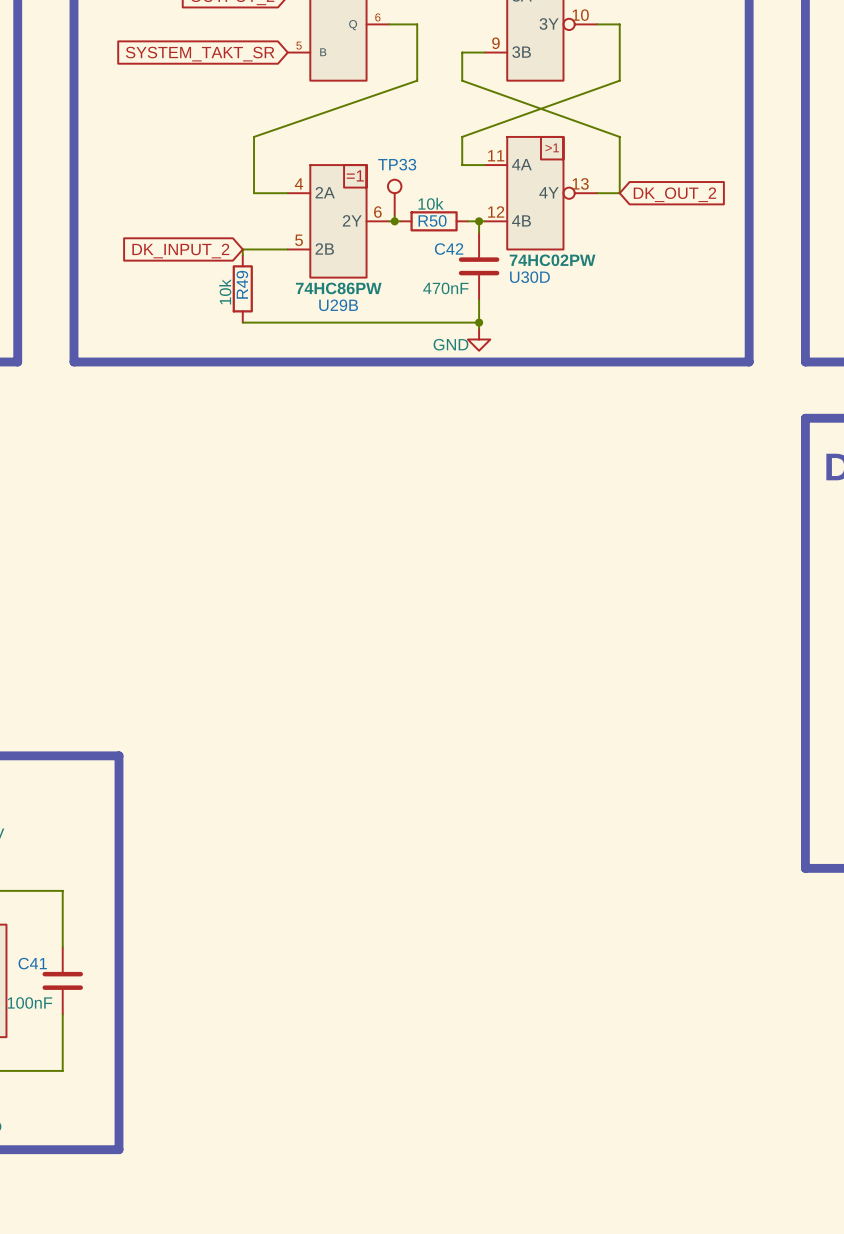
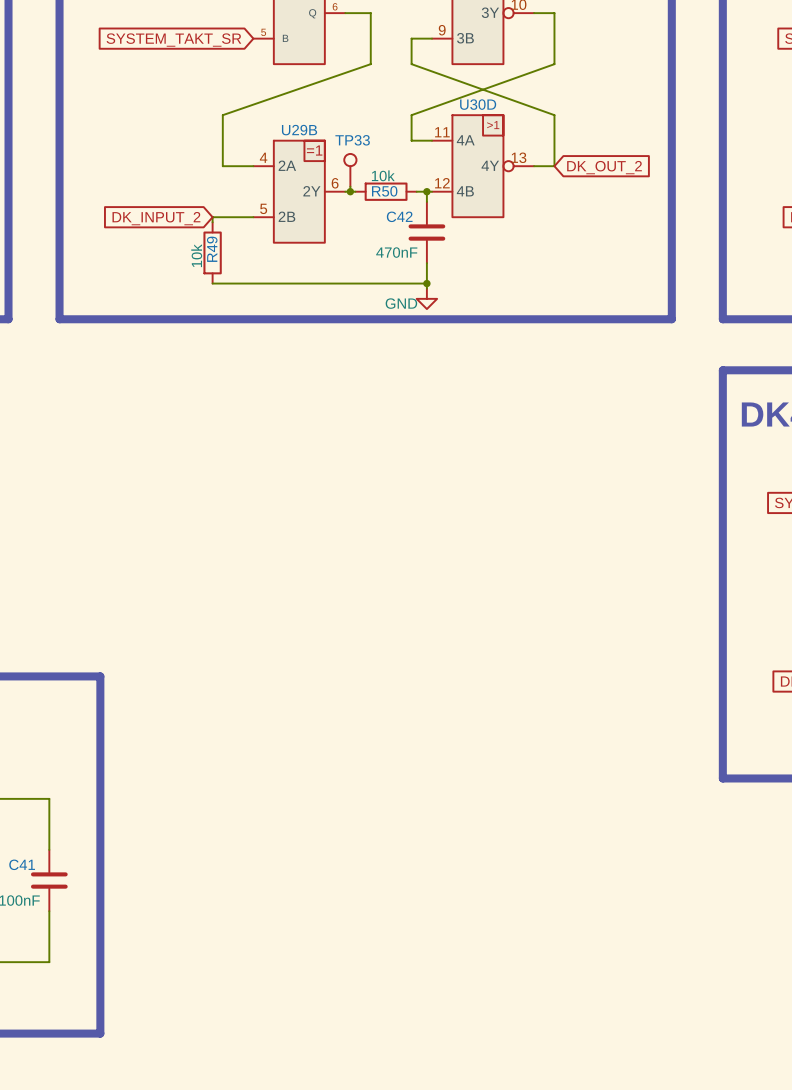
U30D value: 74HC02PW (552, 260) -> none
U30D name position: U30D (529, 277) -> U30D (478, 104)
U29B value: 74HC86PW (338, 288) -> none
U29B name position: U29B (338, 305) -> U29B (299, 130)

